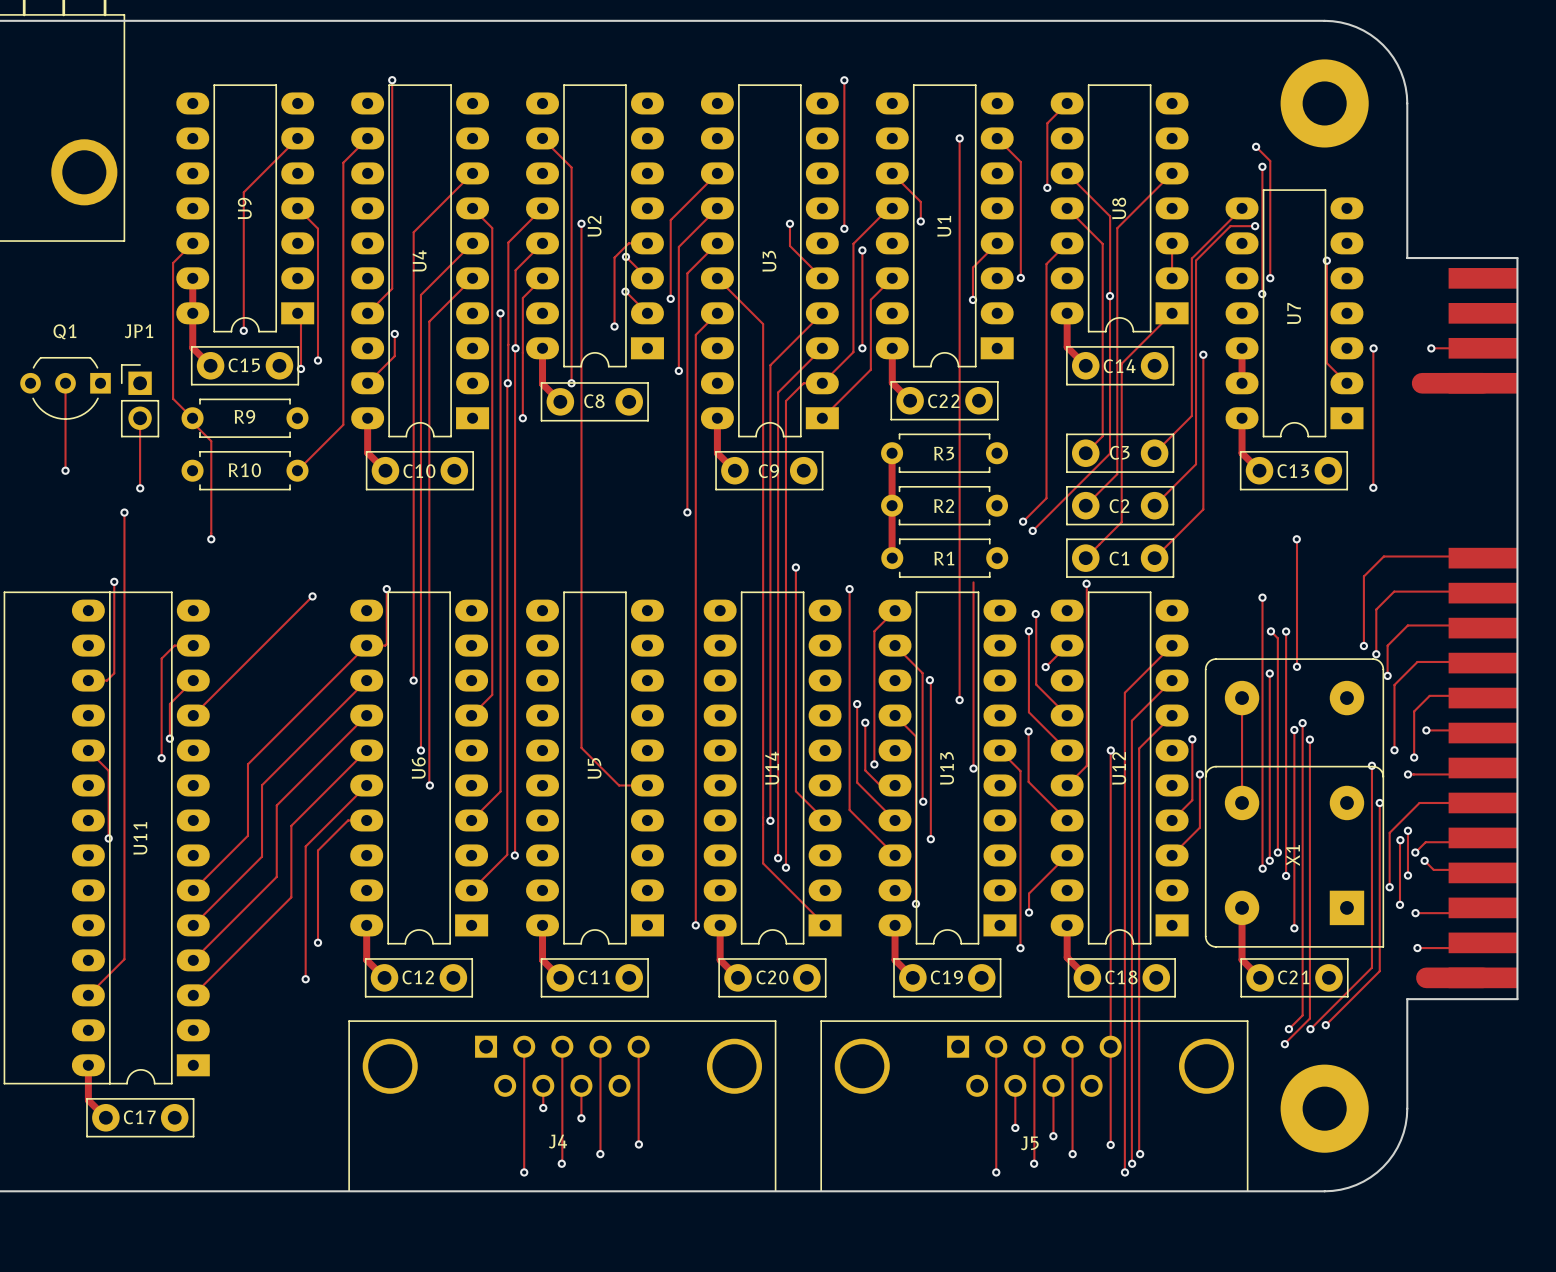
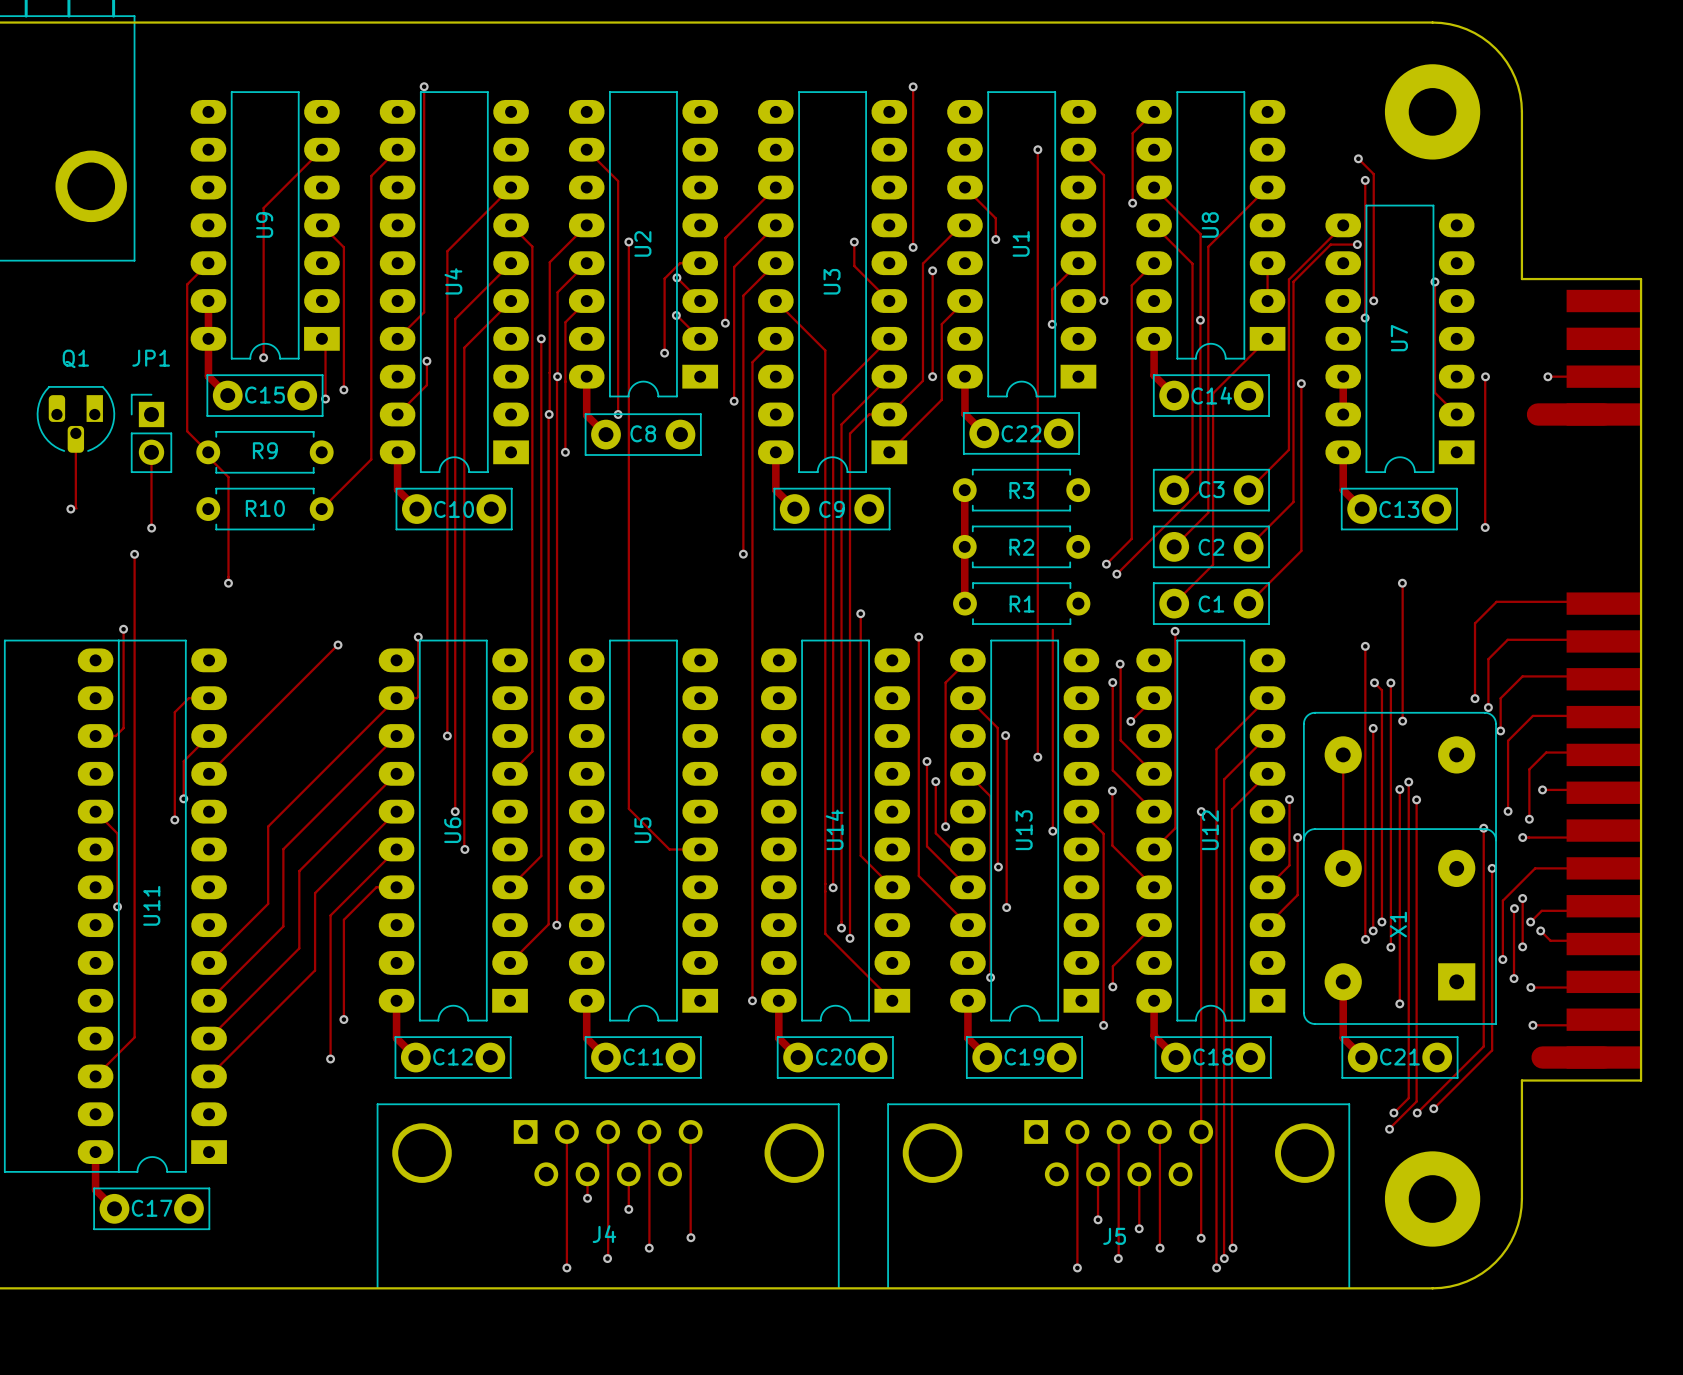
Q1 footprint: [20, 356, 111, 420] -> [36, 386, 116, 453]
track: (65, 383) (65, 470) -> none
track: none -> (75, 433) (76, 508)

